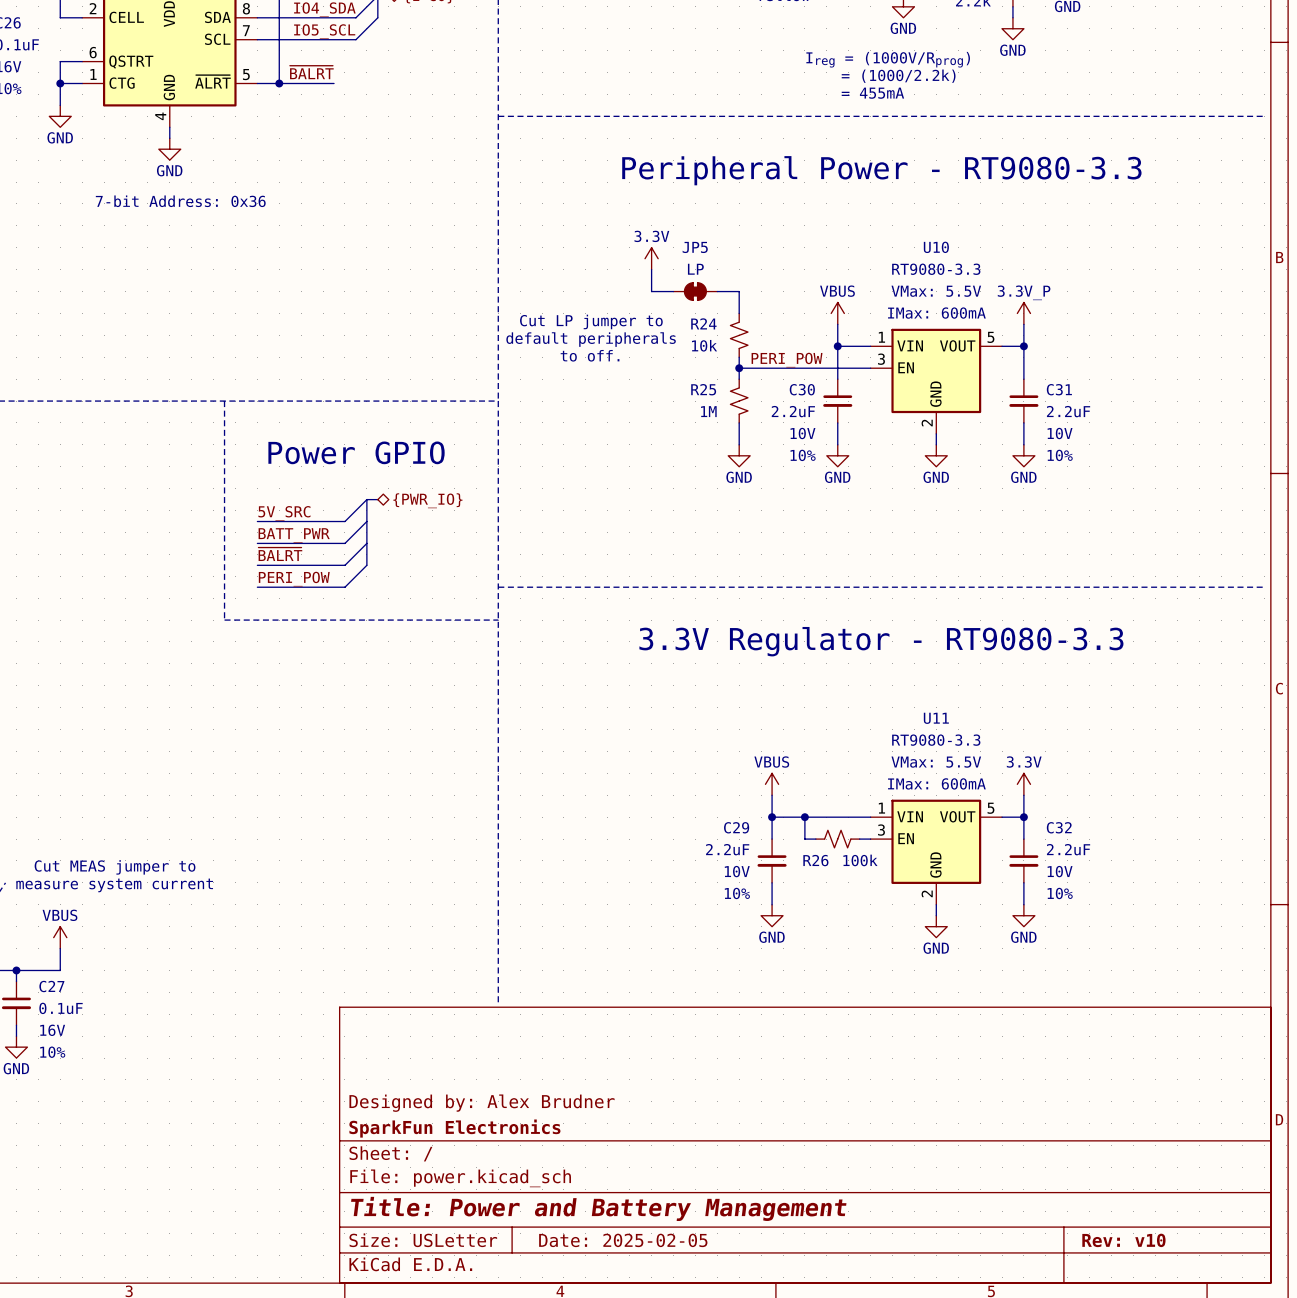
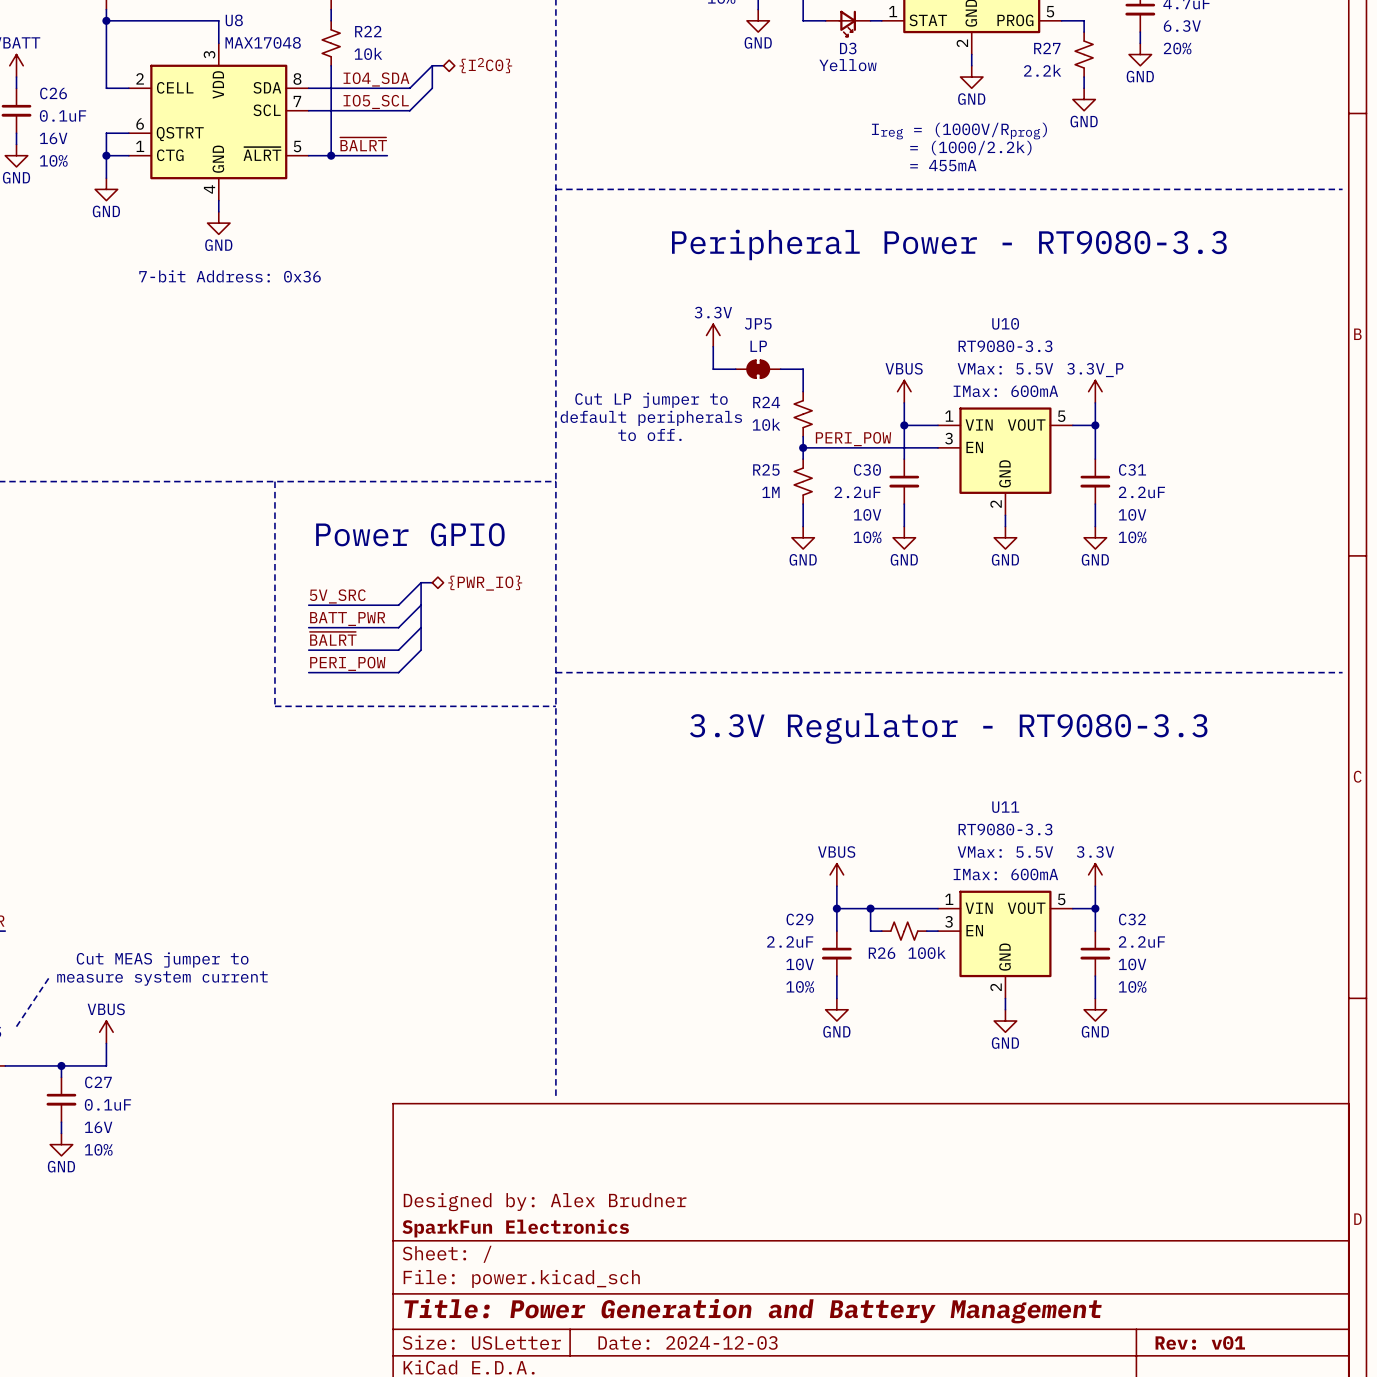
title block: Title: Power and Battery Management (598, 1208) -> Title: Power Generation and Battery Management (753, 1311)
title block: Date: 2025-02-05 (623, 1240) -> Date: 2024-12-03 (688, 1342)
title block: Rev: v10 (1123, 1240) -> Rev: v01 (1200, 1342)

